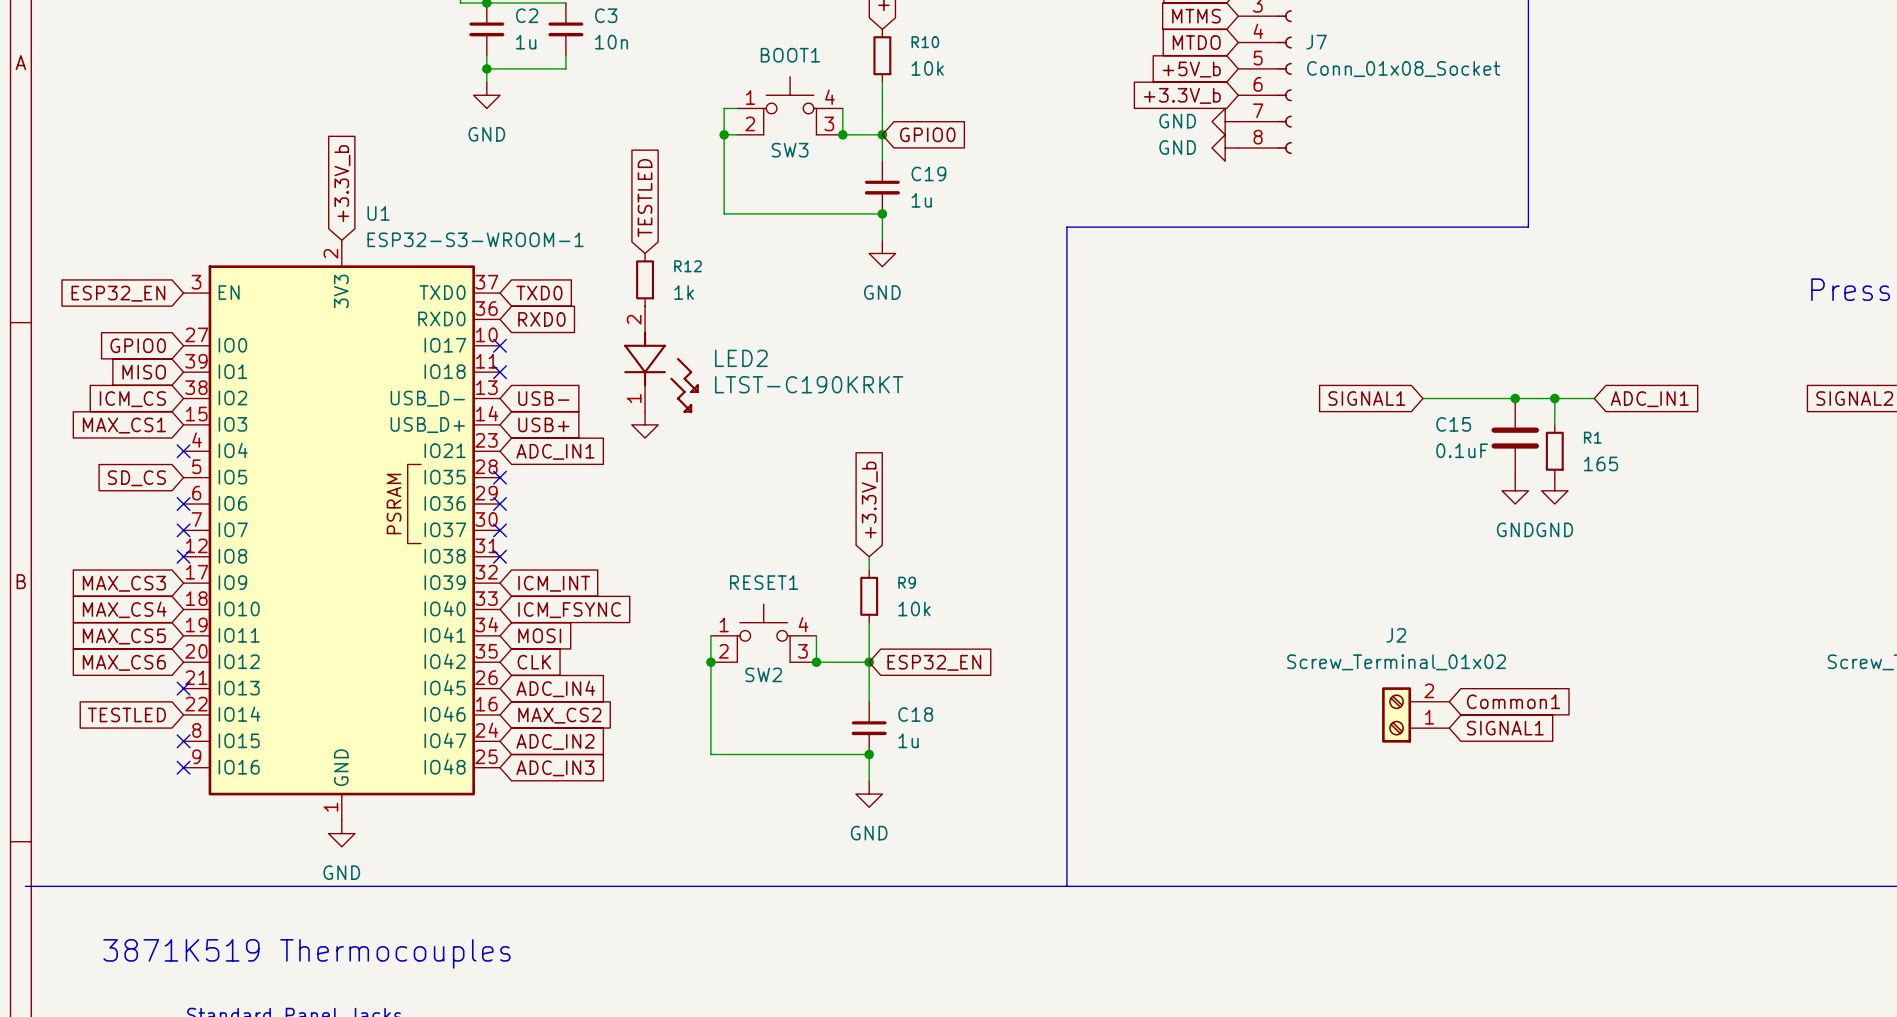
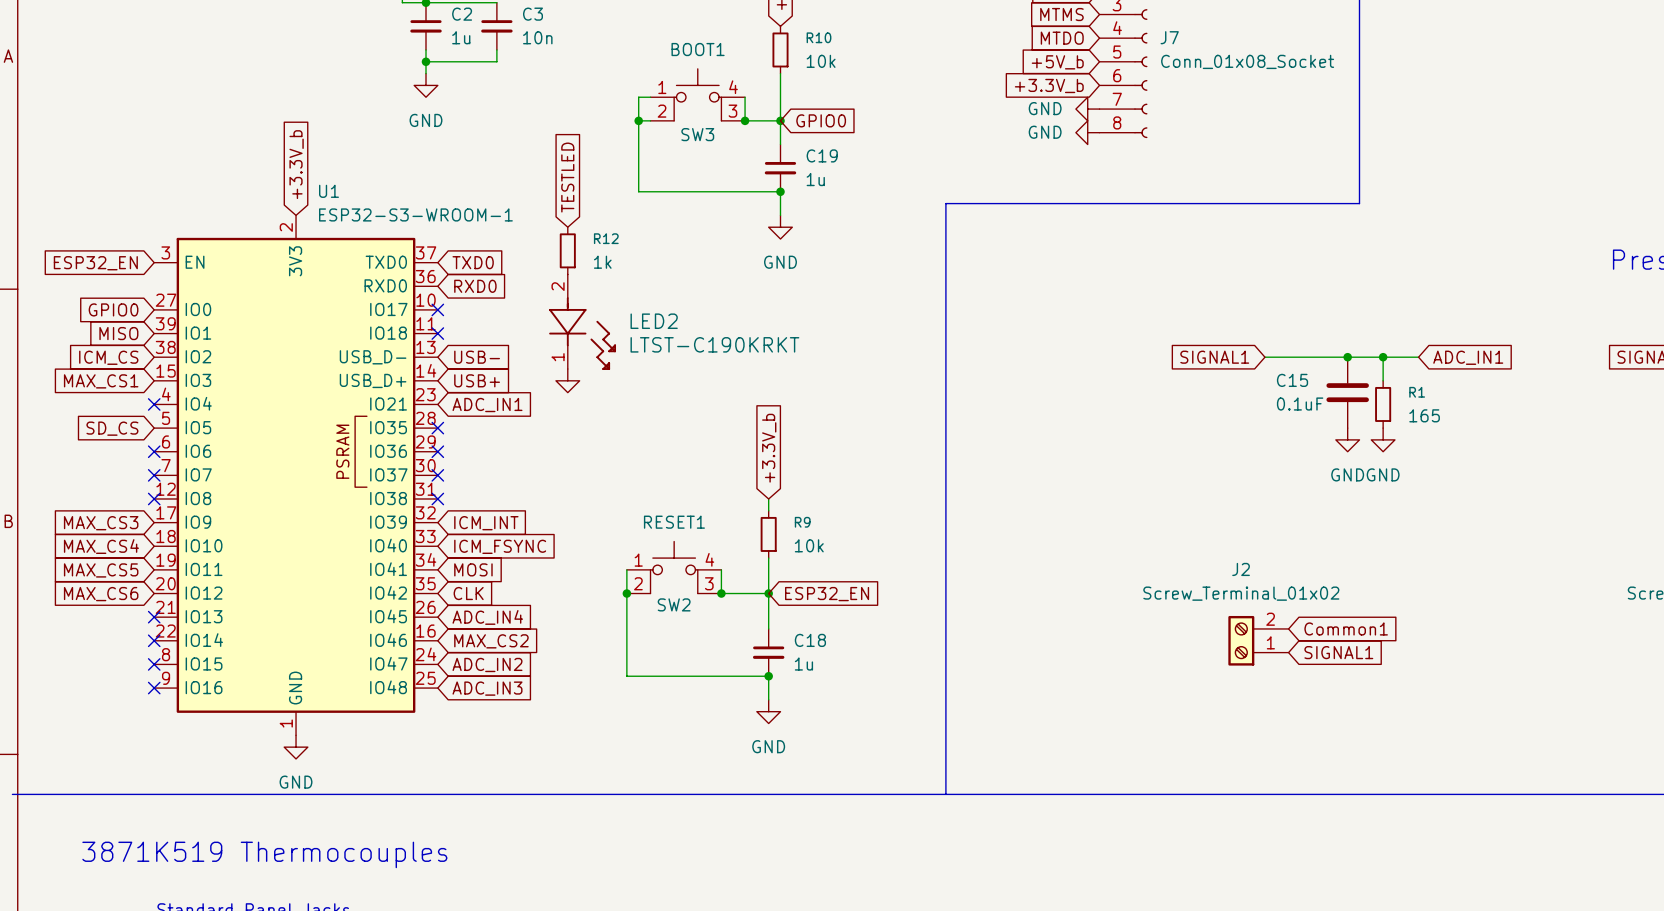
global label: TESTLED (126, 714) -> none
no-connect mark: none -> (154, 640)

